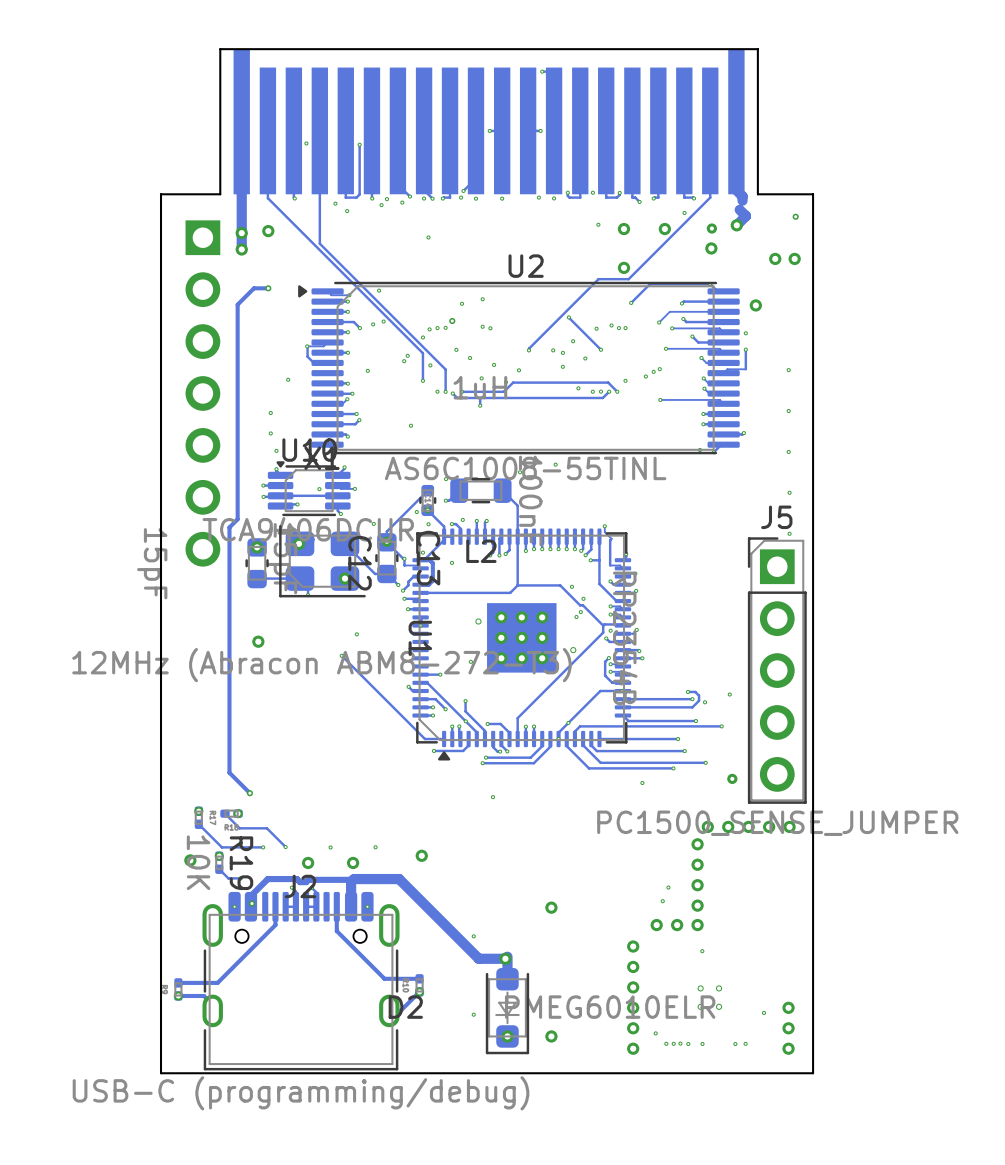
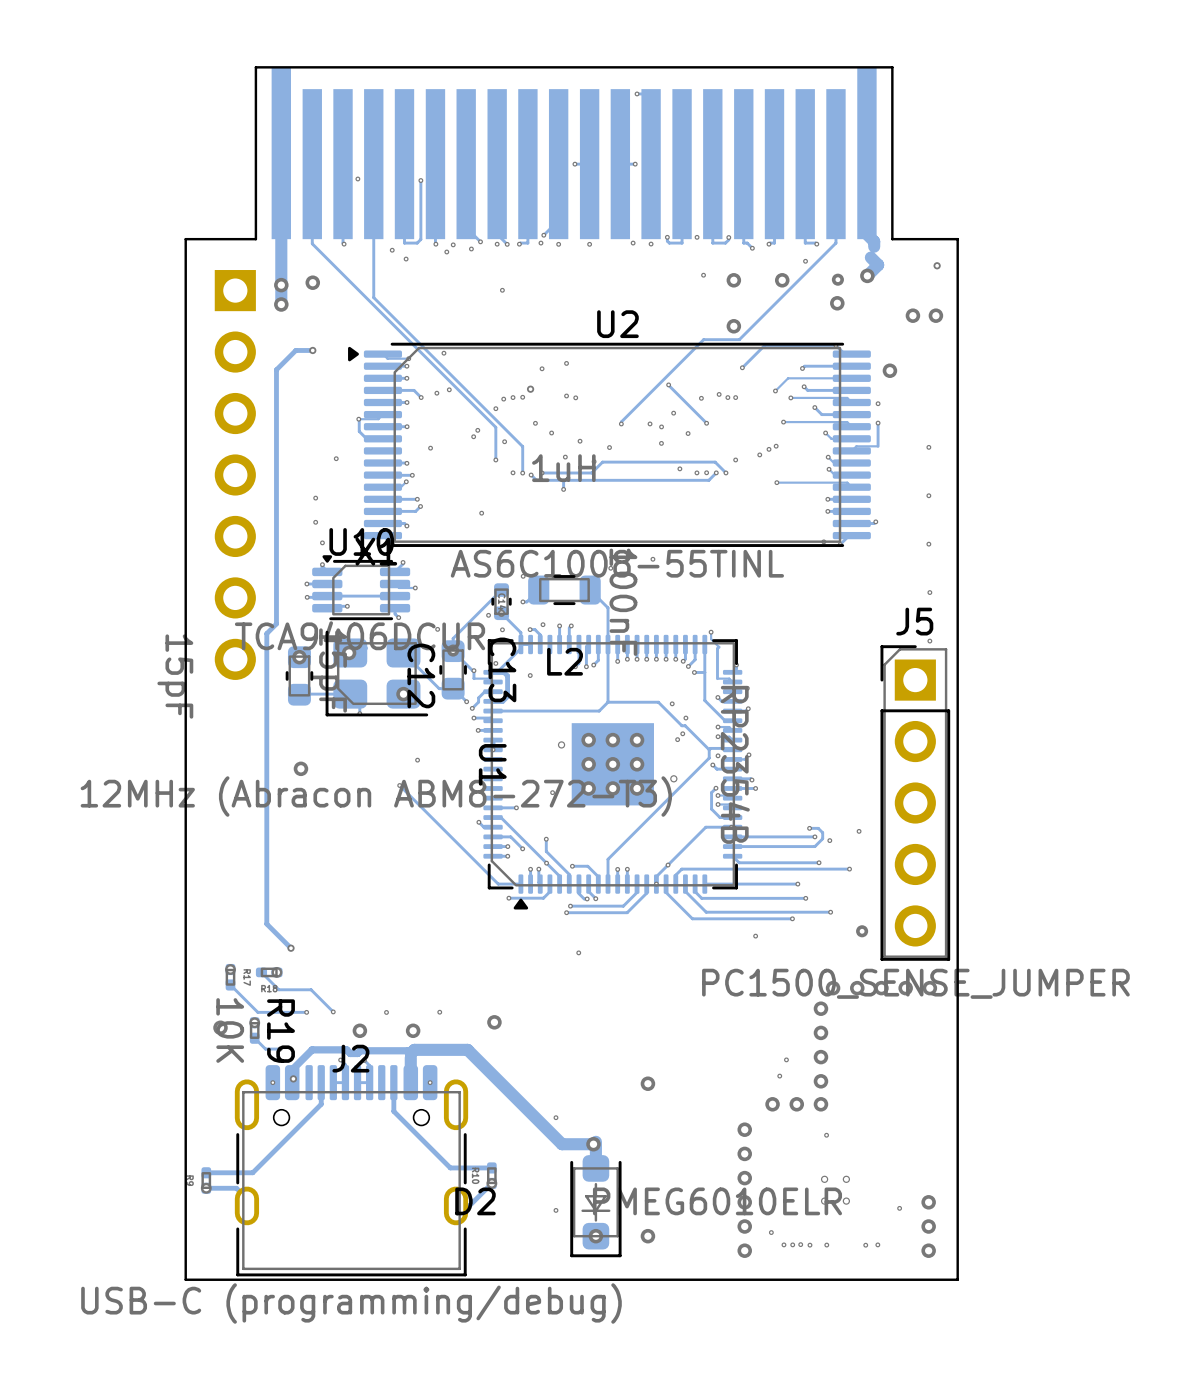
via: (319, 489) -> none

